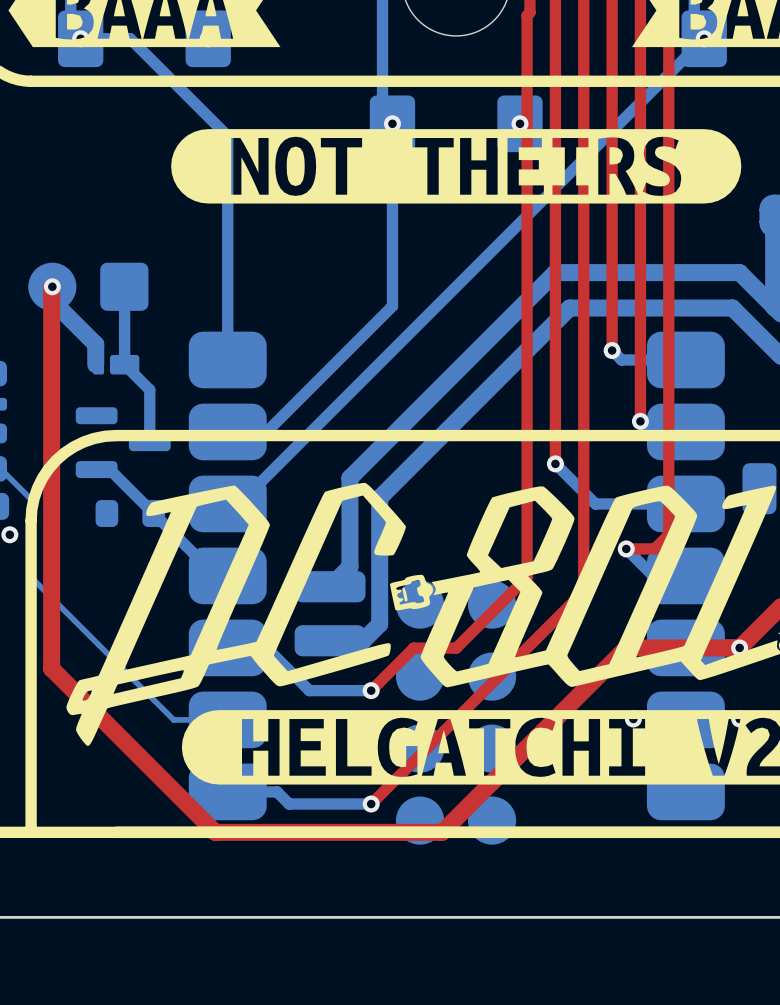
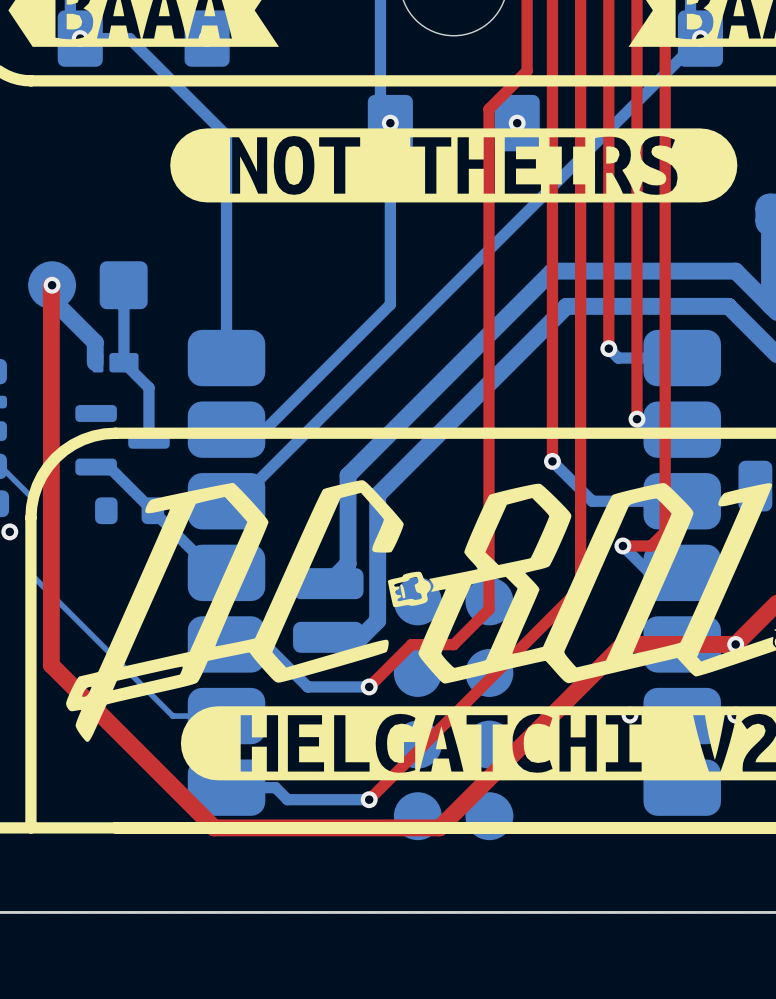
top track: (529, 12) (527, 15) (527, 577) (491, 612) -> (527, 12) (527, 70) (489, 109) (489, 609)

